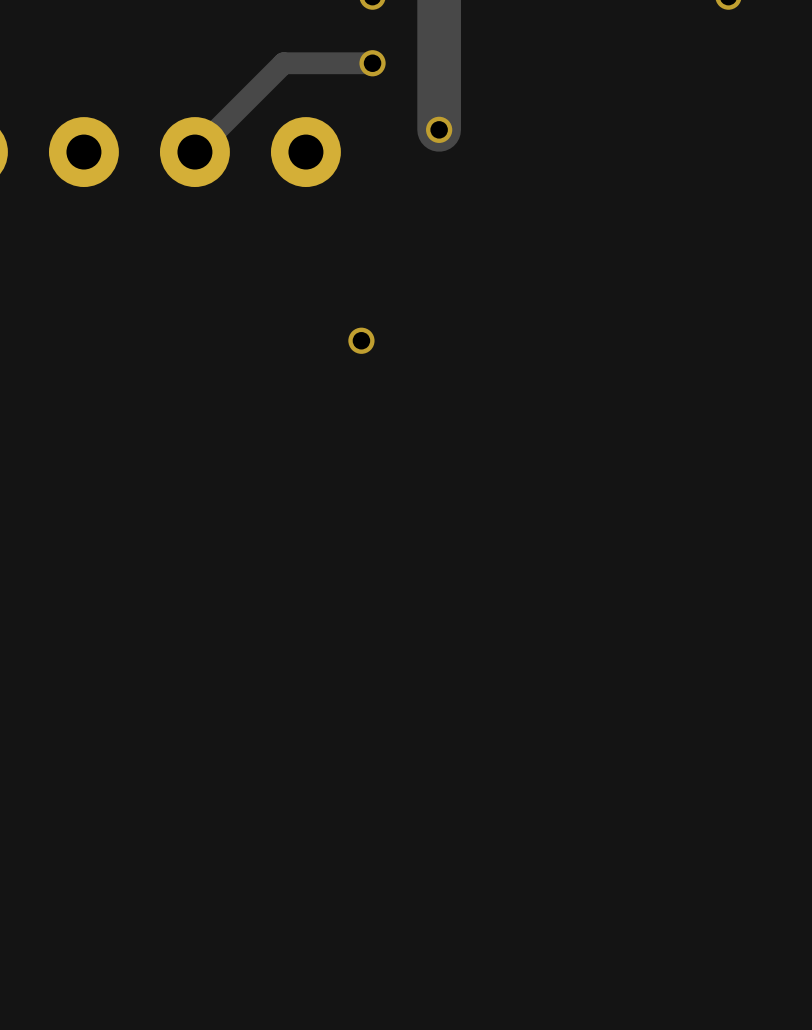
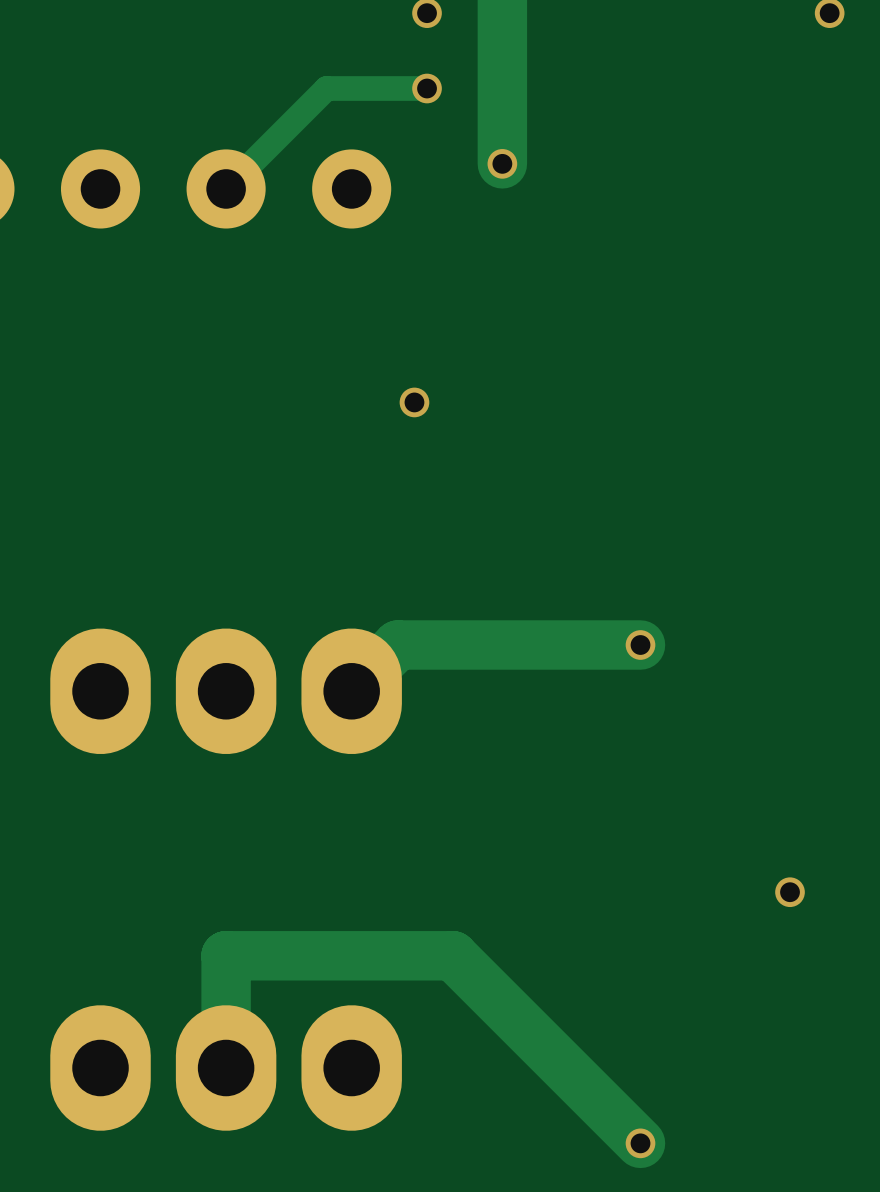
track: none -> (640, 645) (397, 645) (351, 691) (351, 678)
via: none -> (640, 645)
part: none -> (226, 691)
via: none -> (790, 892)
track: none -> (226, 1068) (226, 955) (452, 955) (640, 1143)
part: none -> (226, 1068)
via: none -> (640, 1143)

